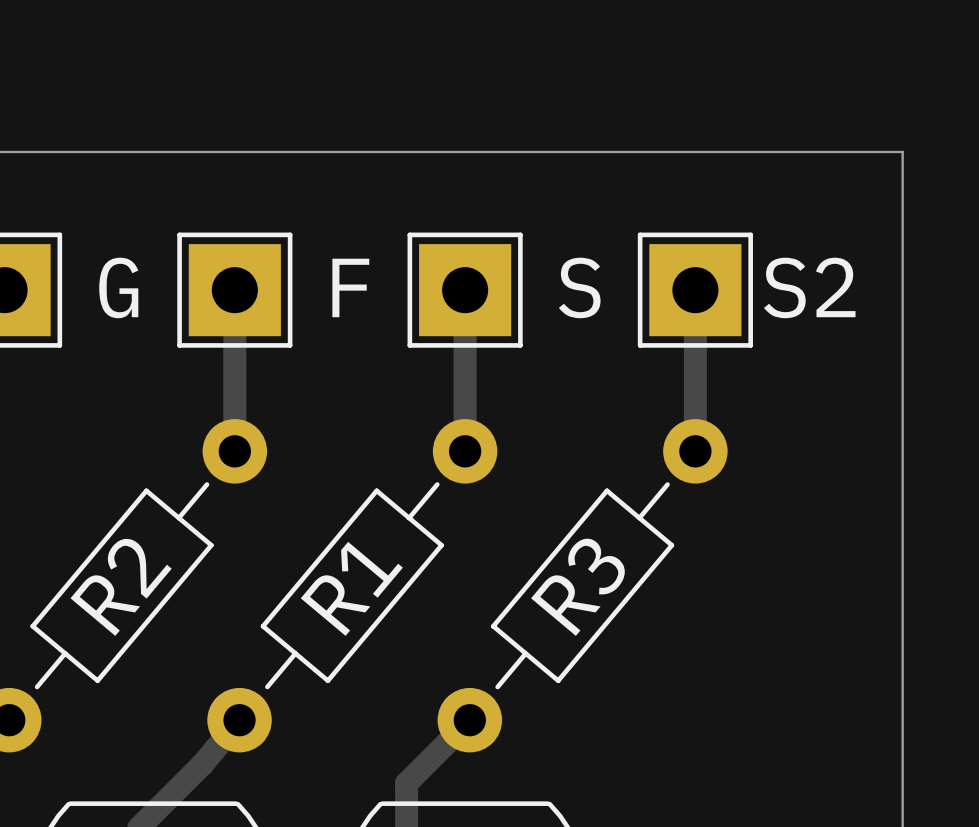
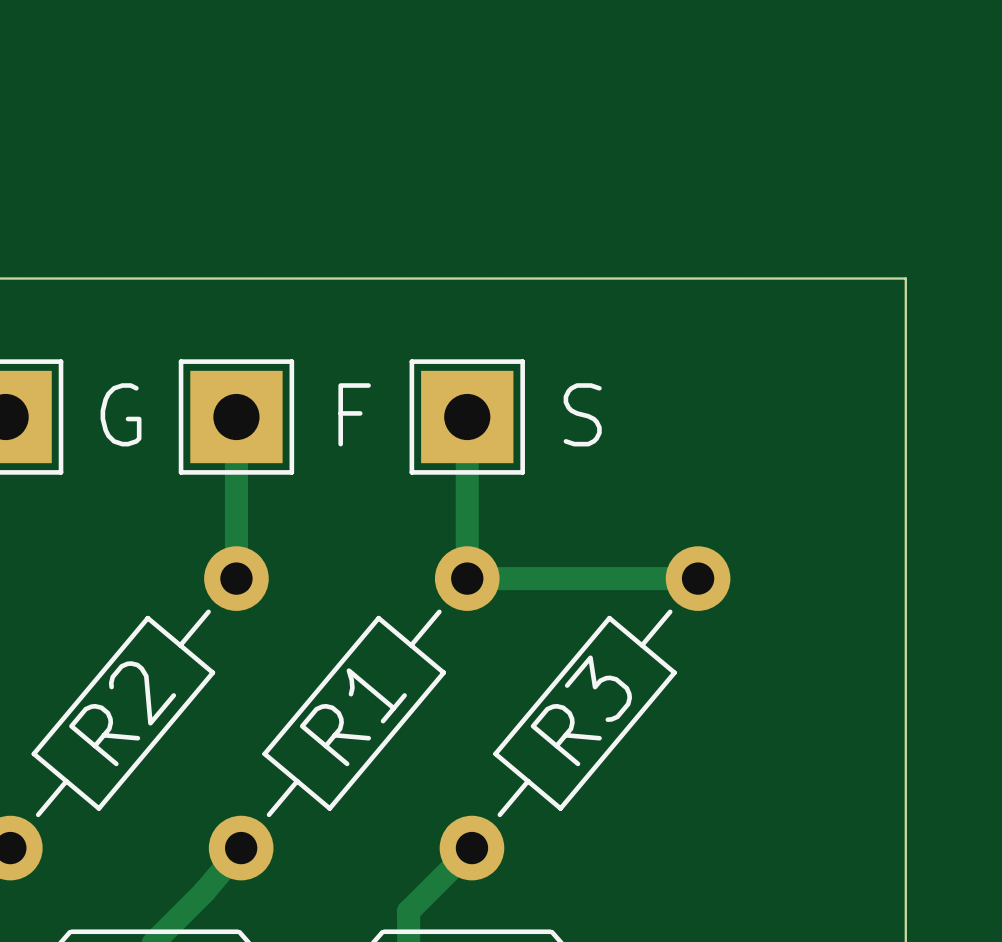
track: (695, 290) (695, 451) -> (467, 578) (698, 578)
part: S2 (695, 290) -> none

